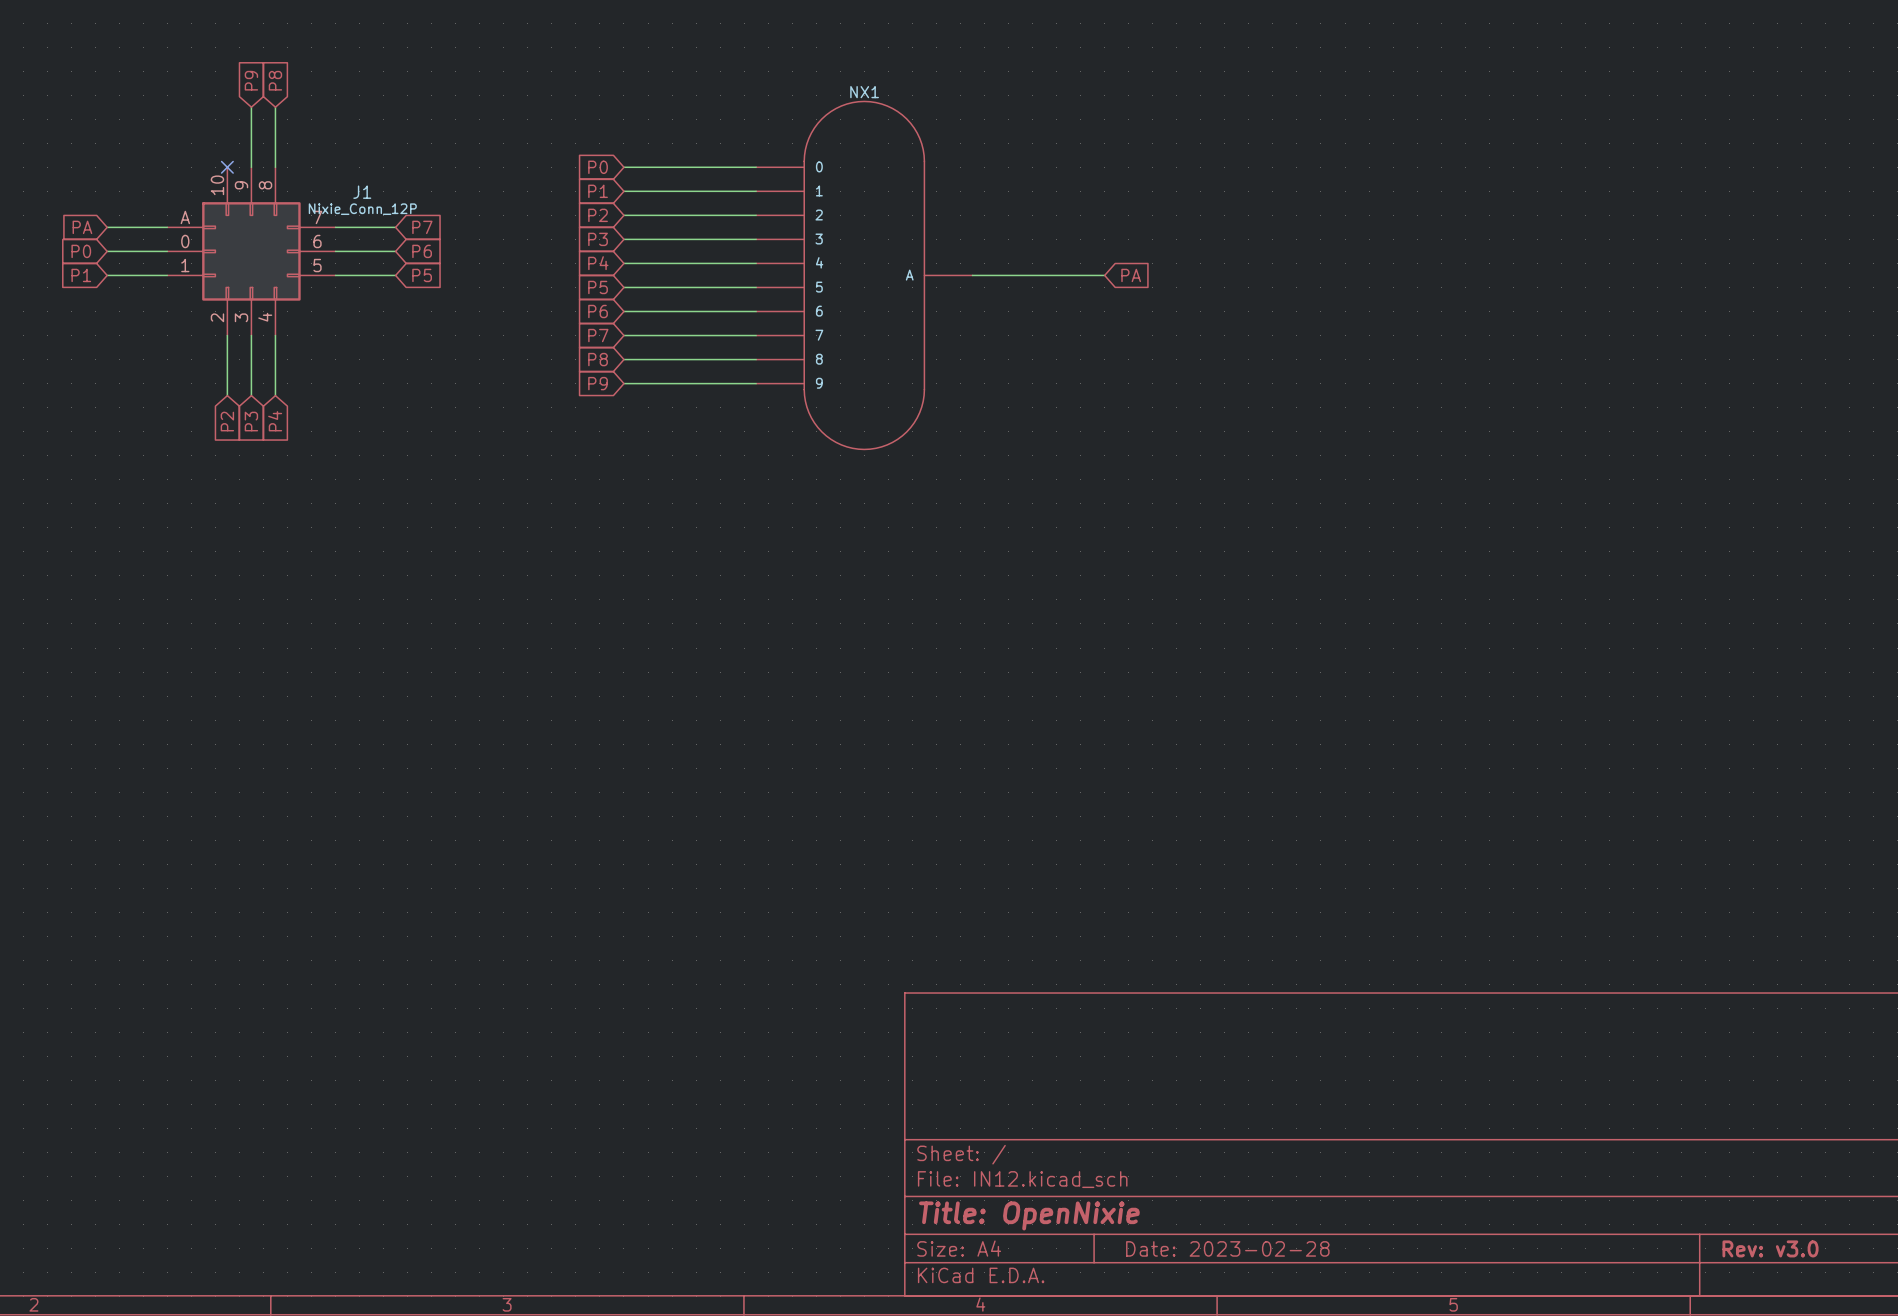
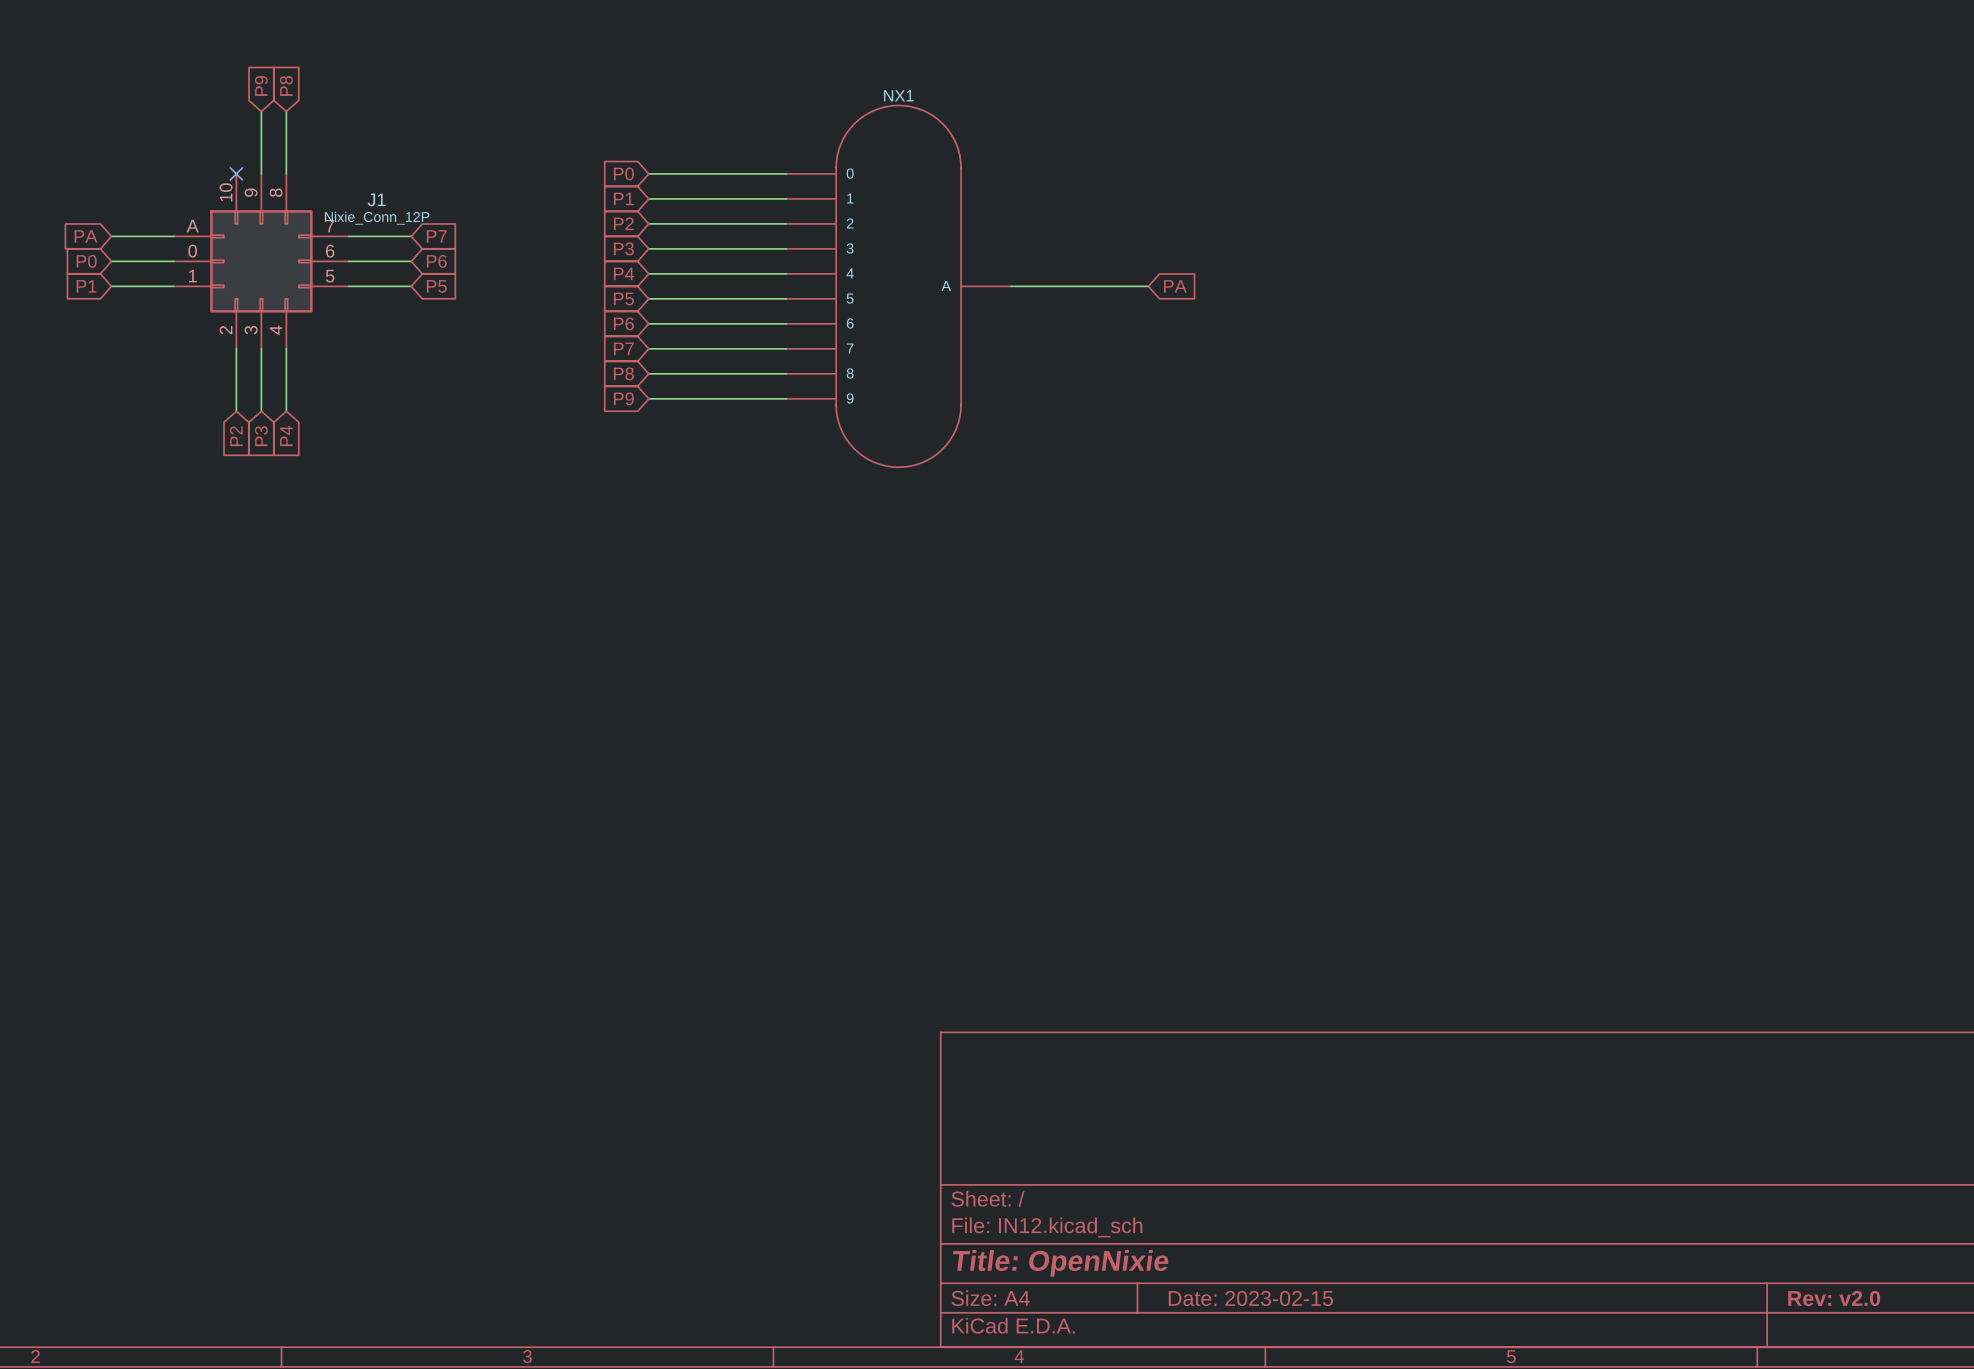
title block: Date: 2023-02-28 (1227, 1248) -> Date: 2023-02-15 (1250, 1298)
title block: Rev: v3.0 (1770, 1248) -> Rev: v2.0 (1834, 1298)

